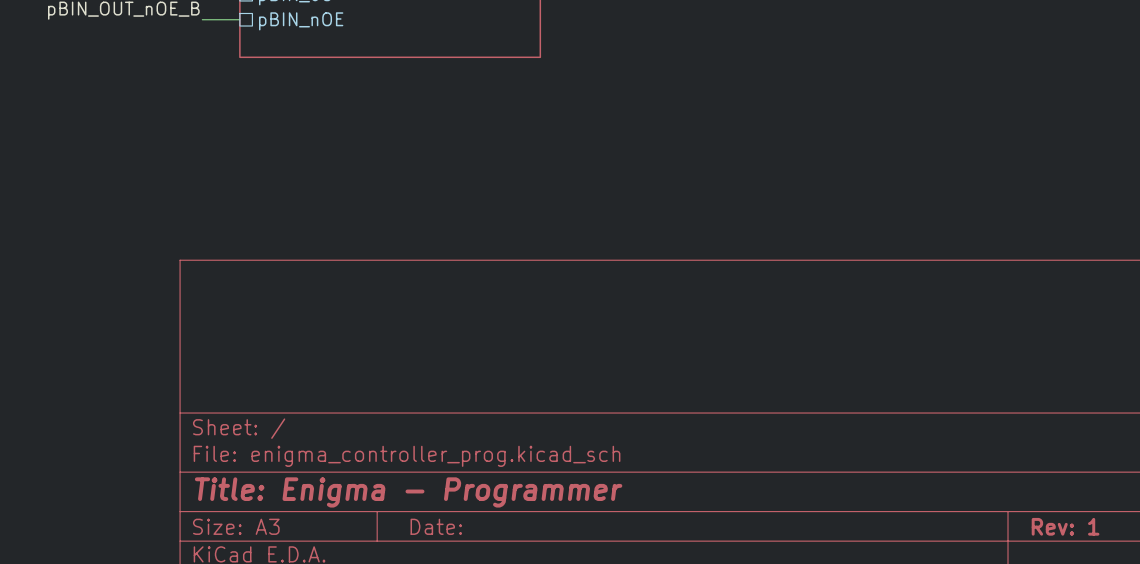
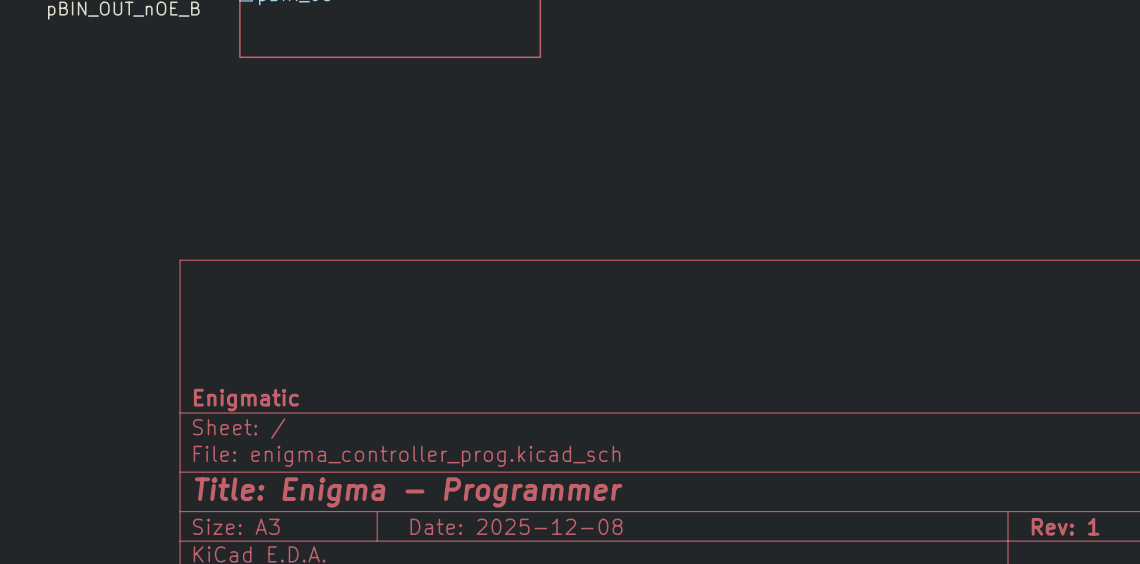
wire: (202, 19) (239, 19) -> none
sheet pin: pBIN_nOE (301, 21) -> none
title block: none -> Enigmatic (246, 400)
title block: Date: (436, 526) -> Date: 2025-12-08 (516, 526)

